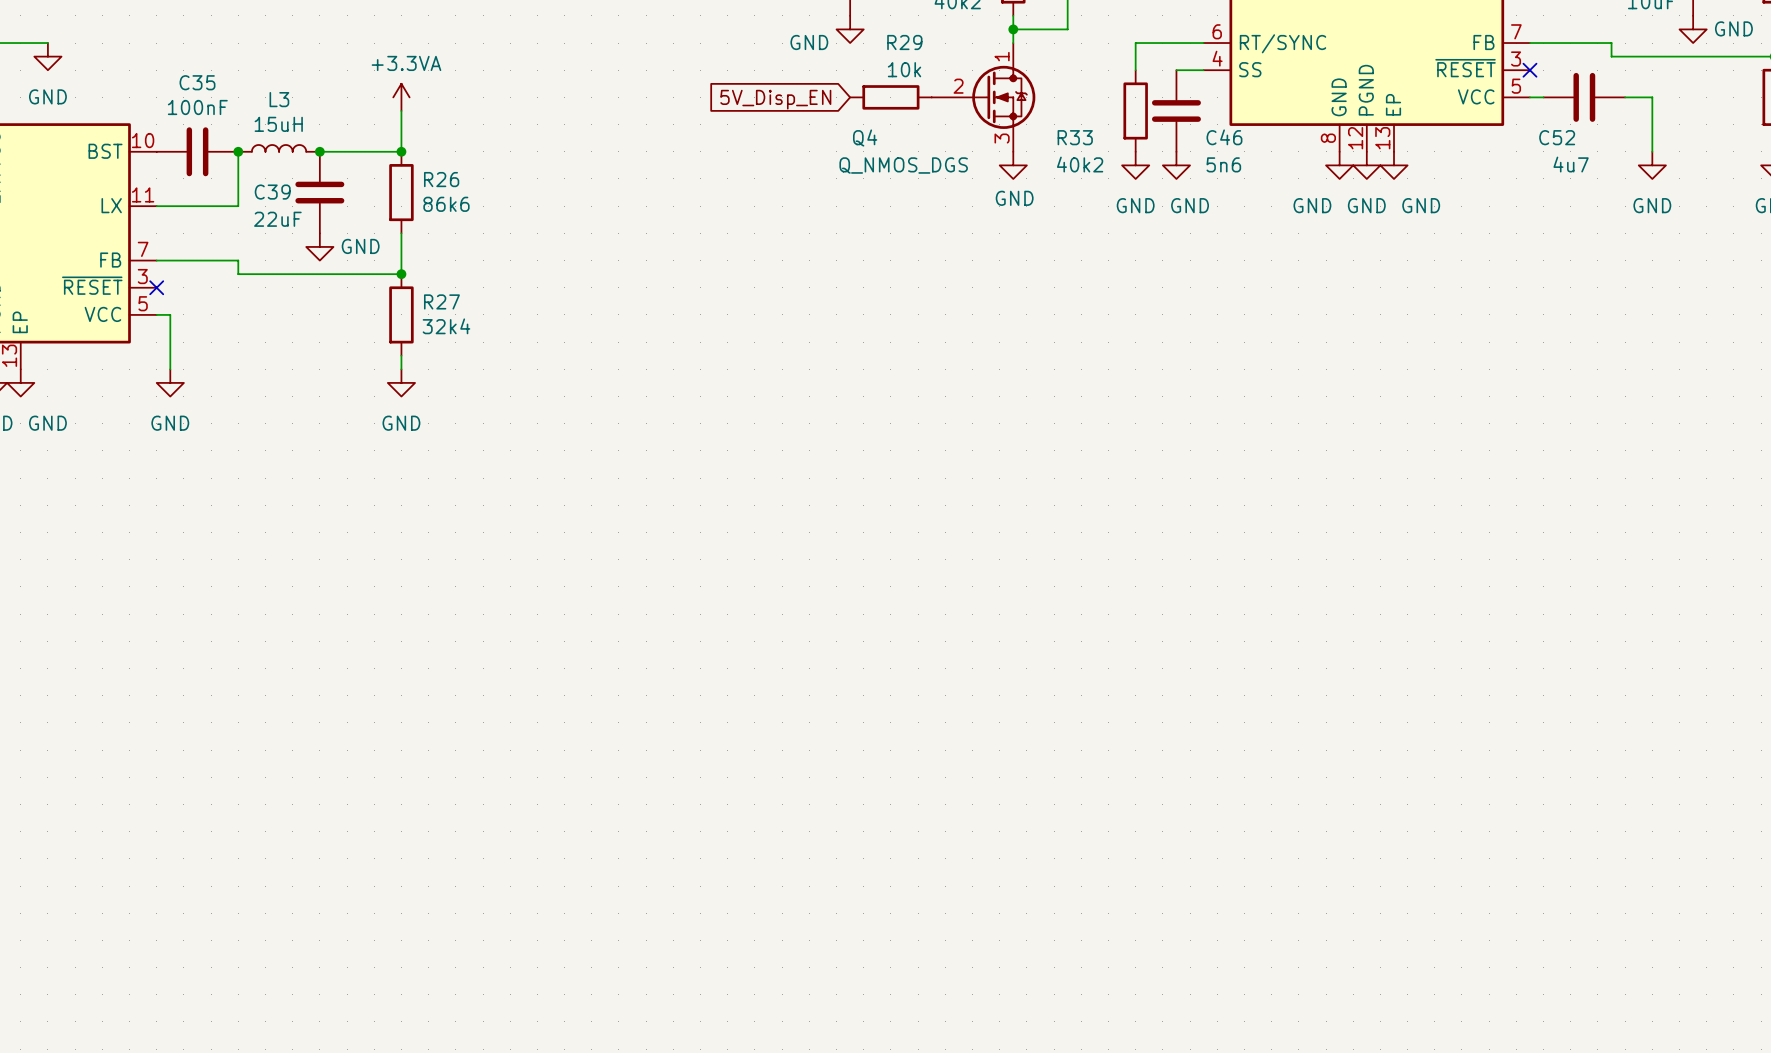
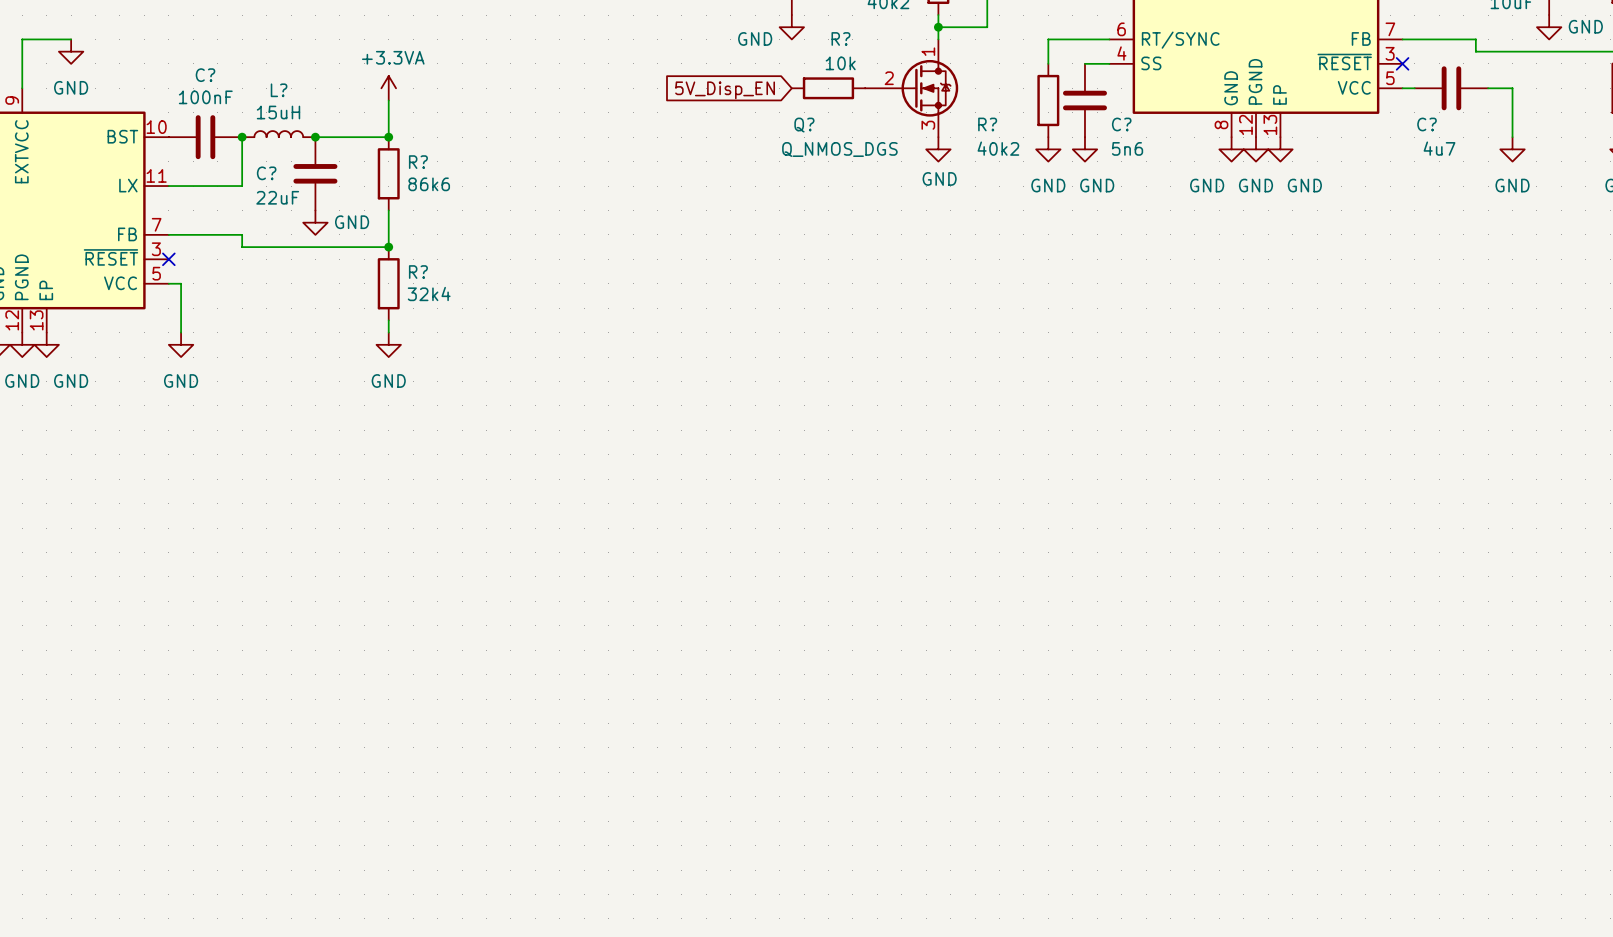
R29 name: R29 (904, 42) -> R? (840, 38)
C35 name: C35 (197, 82) -> C? (205, 75)
L3 name: L3 (279, 99) -> L? (279, 90)
R33 name: R33 (1075, 137) -> R? (987, 124)
C46 name: C46 (1224, 137) -> C? (1121, 124)
C52 name: C52 (1557, 137) -> C? (1427, 124)
Q4 name: Q4 (865, 138) -> Q? (804, 125)
R26 name: R26 (441, 179) -> R? (418, 162)
C39 name: C39 (272, 192) -> C? (266, 173)
R27 name: R27 (441, 301) -> R? (418, 272)

